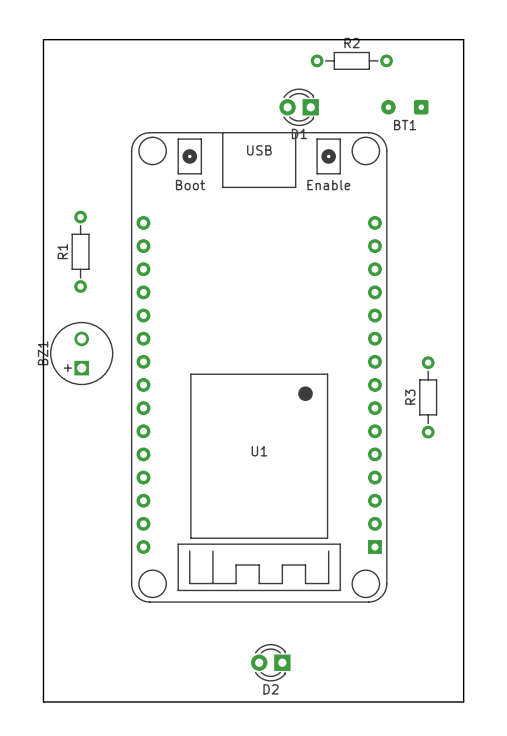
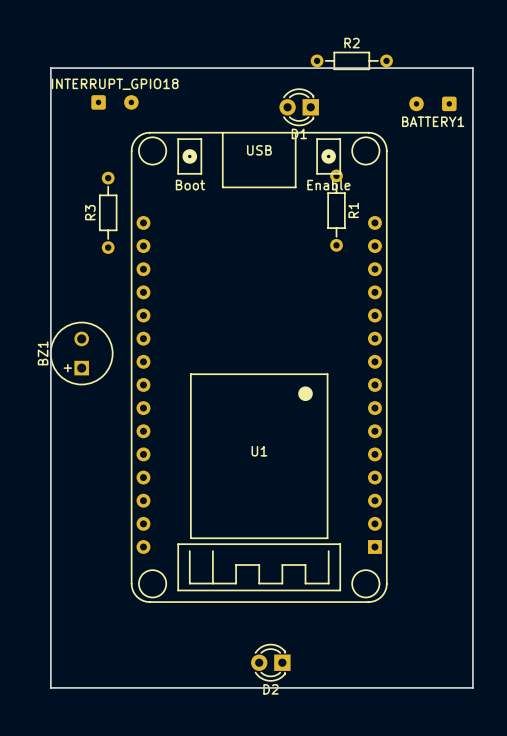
board edge: (43, 39) (463, 39) (463, 701) (43, 701) (43, 39) -> (50, 68) (50, 687) (472, 687) (472, 68) (50, 68)
INTERRUPT_GPIO18: none -> (114, 102)
BATTERY1: none -> (432, 103)
BT1: (404, 107) -> none
R1 name position: R1 (62, 251) -> R1 (353, 210)
R1 position: (80, 251) -> (336, 210)
R3 position: (428, 397) -> (108, 212)

